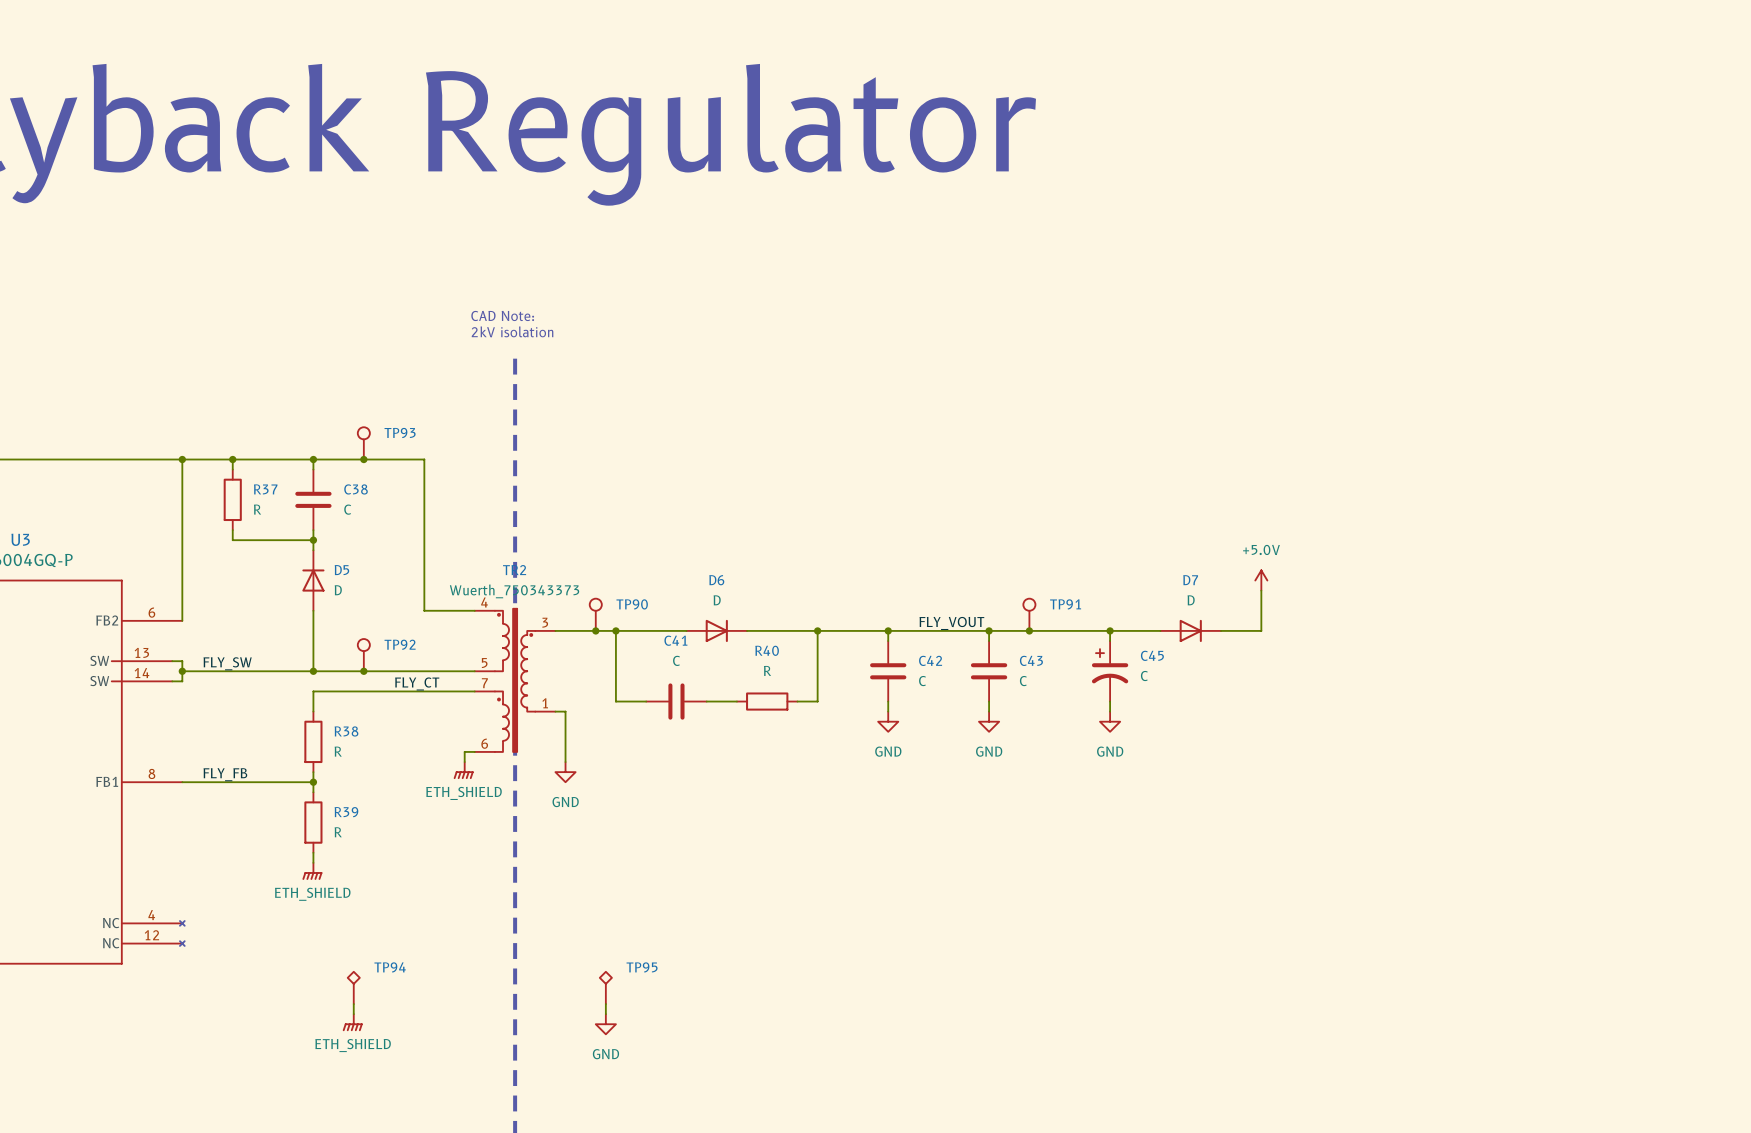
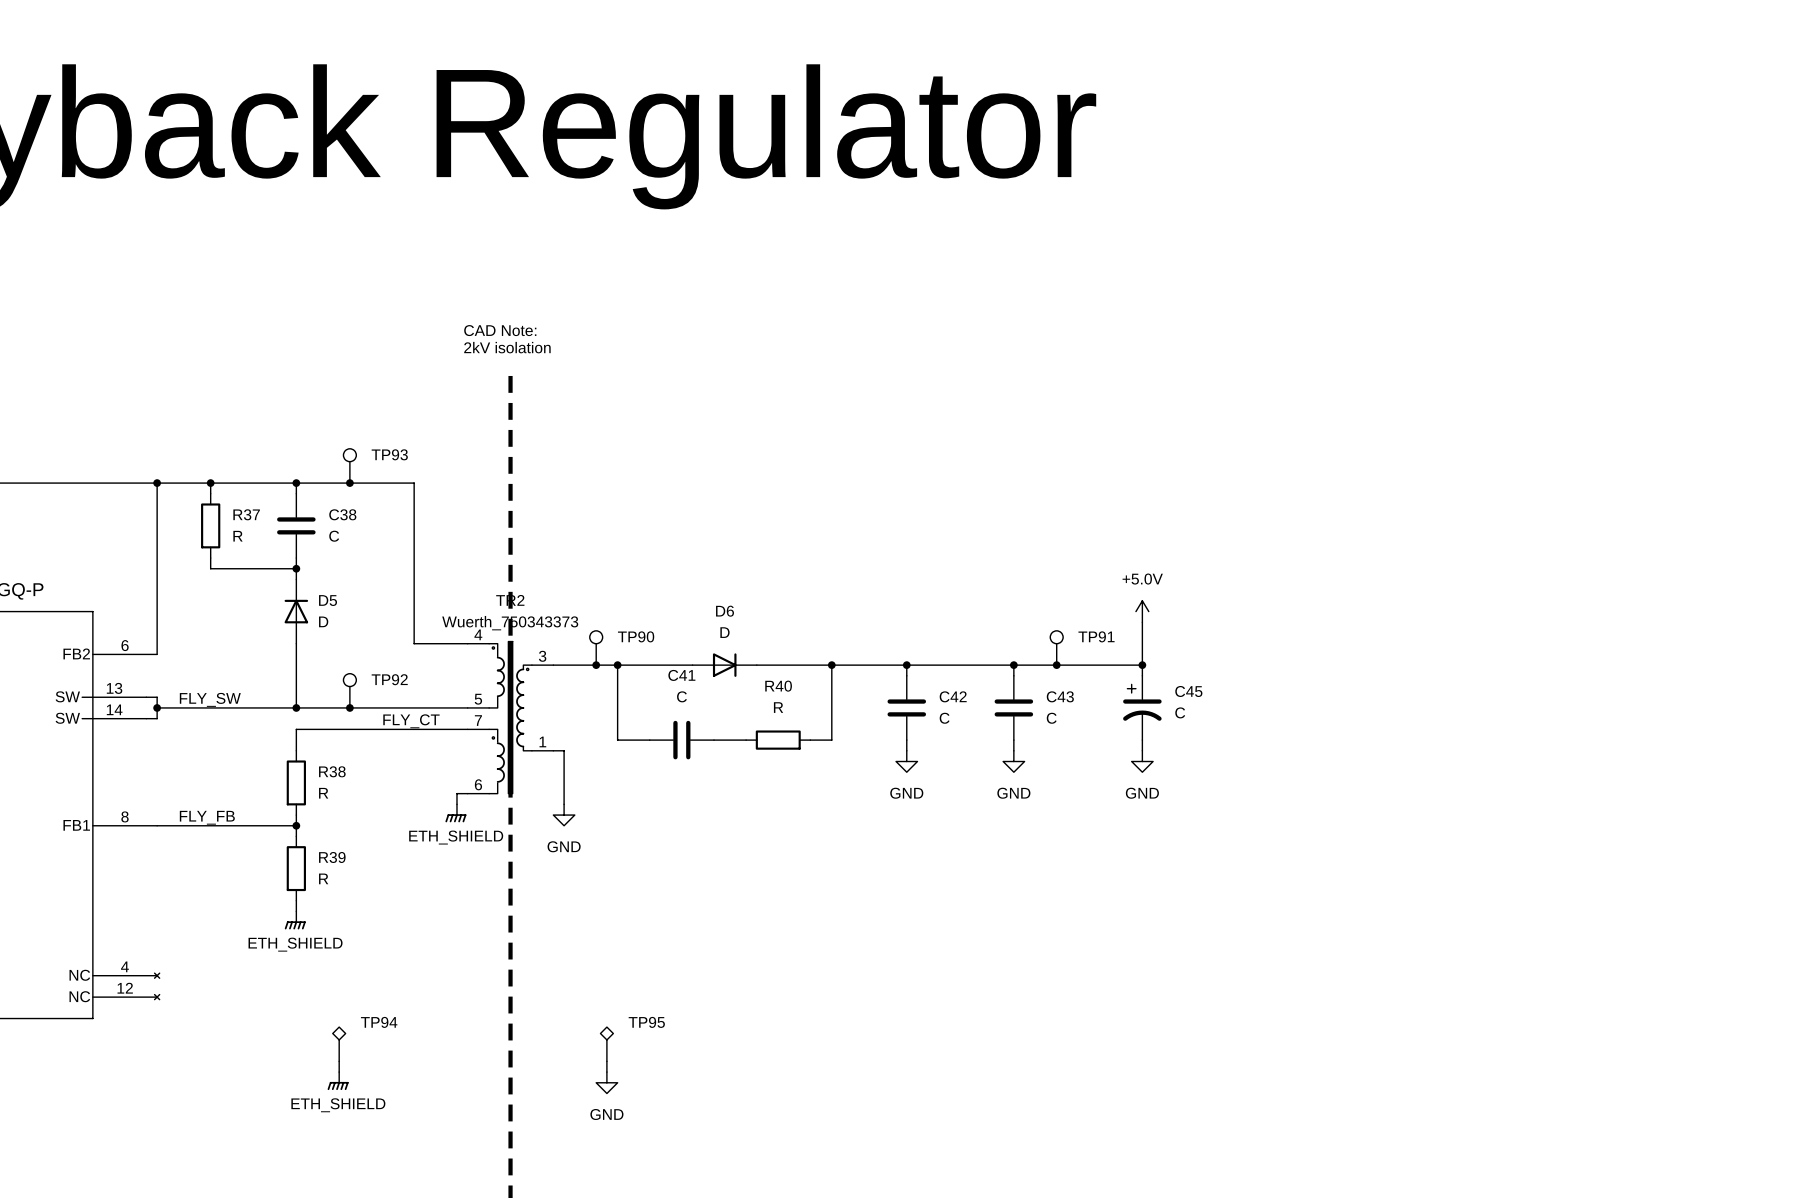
power symbol position: +5.0V (1261, 580) -> +5.0V (1142, 611)
wire: (1261, 590) (1261, 630) (1221, 630) -> none
label: FLY_VOUT (951, 623) -> none
wire: (1110, 630) (1160, 630) -> (1142, 665) (1142, 622)
D7: D (1190, 630) -> none

